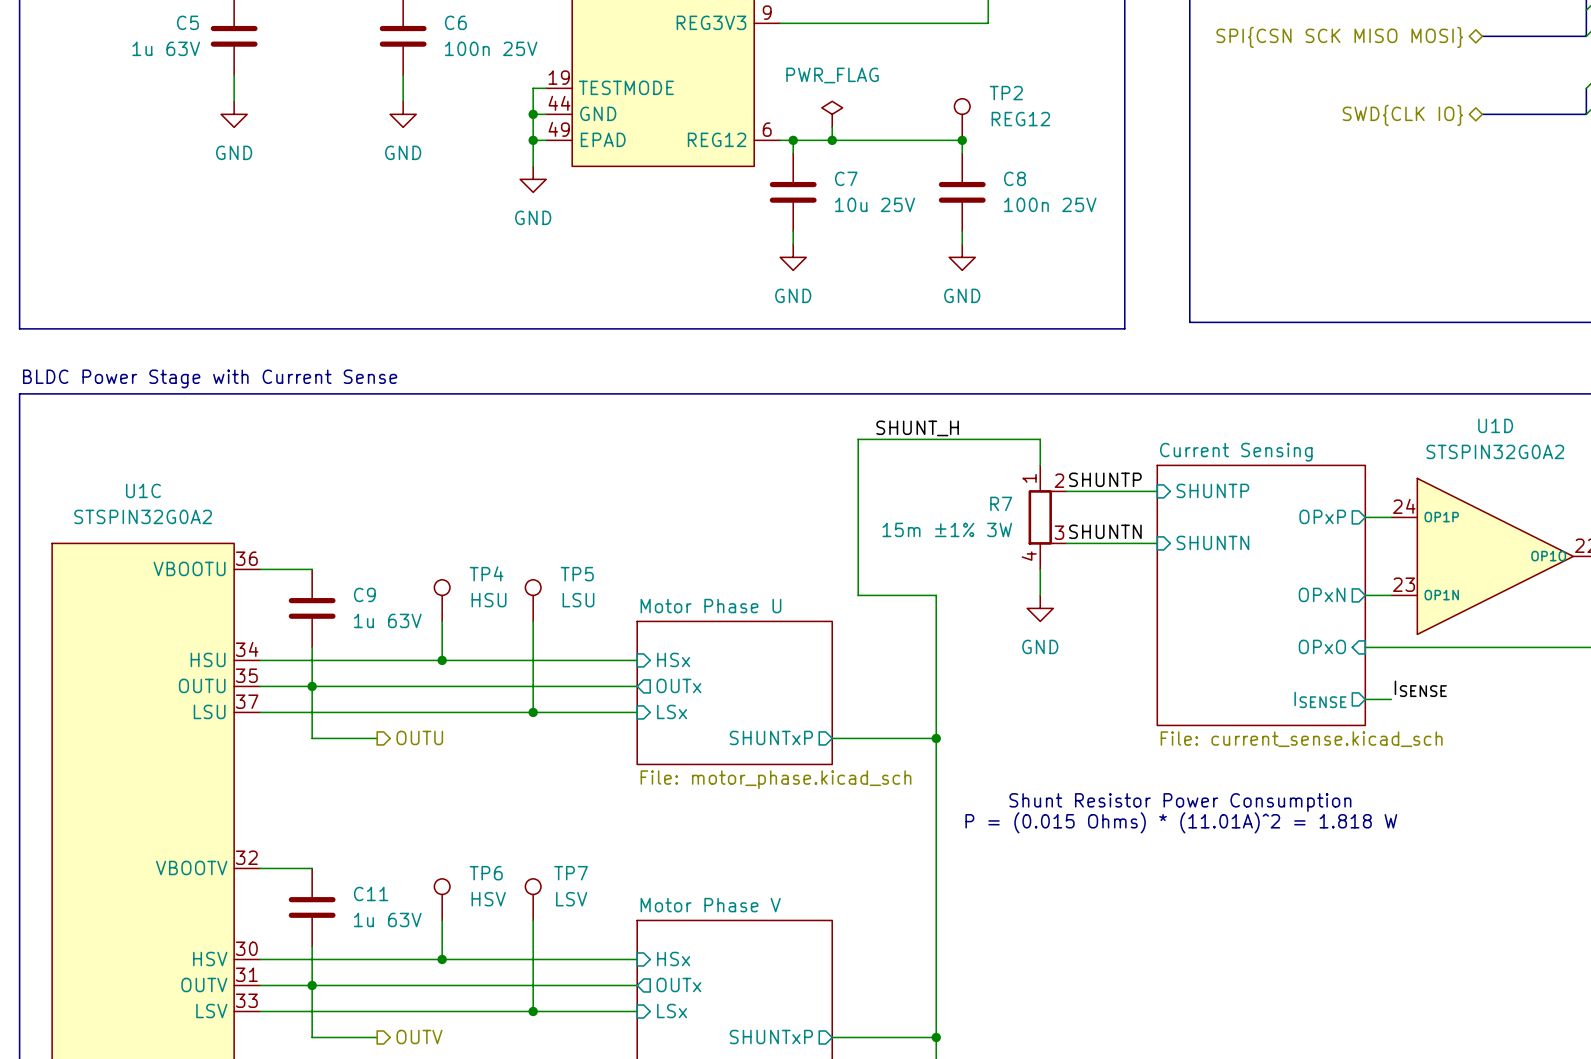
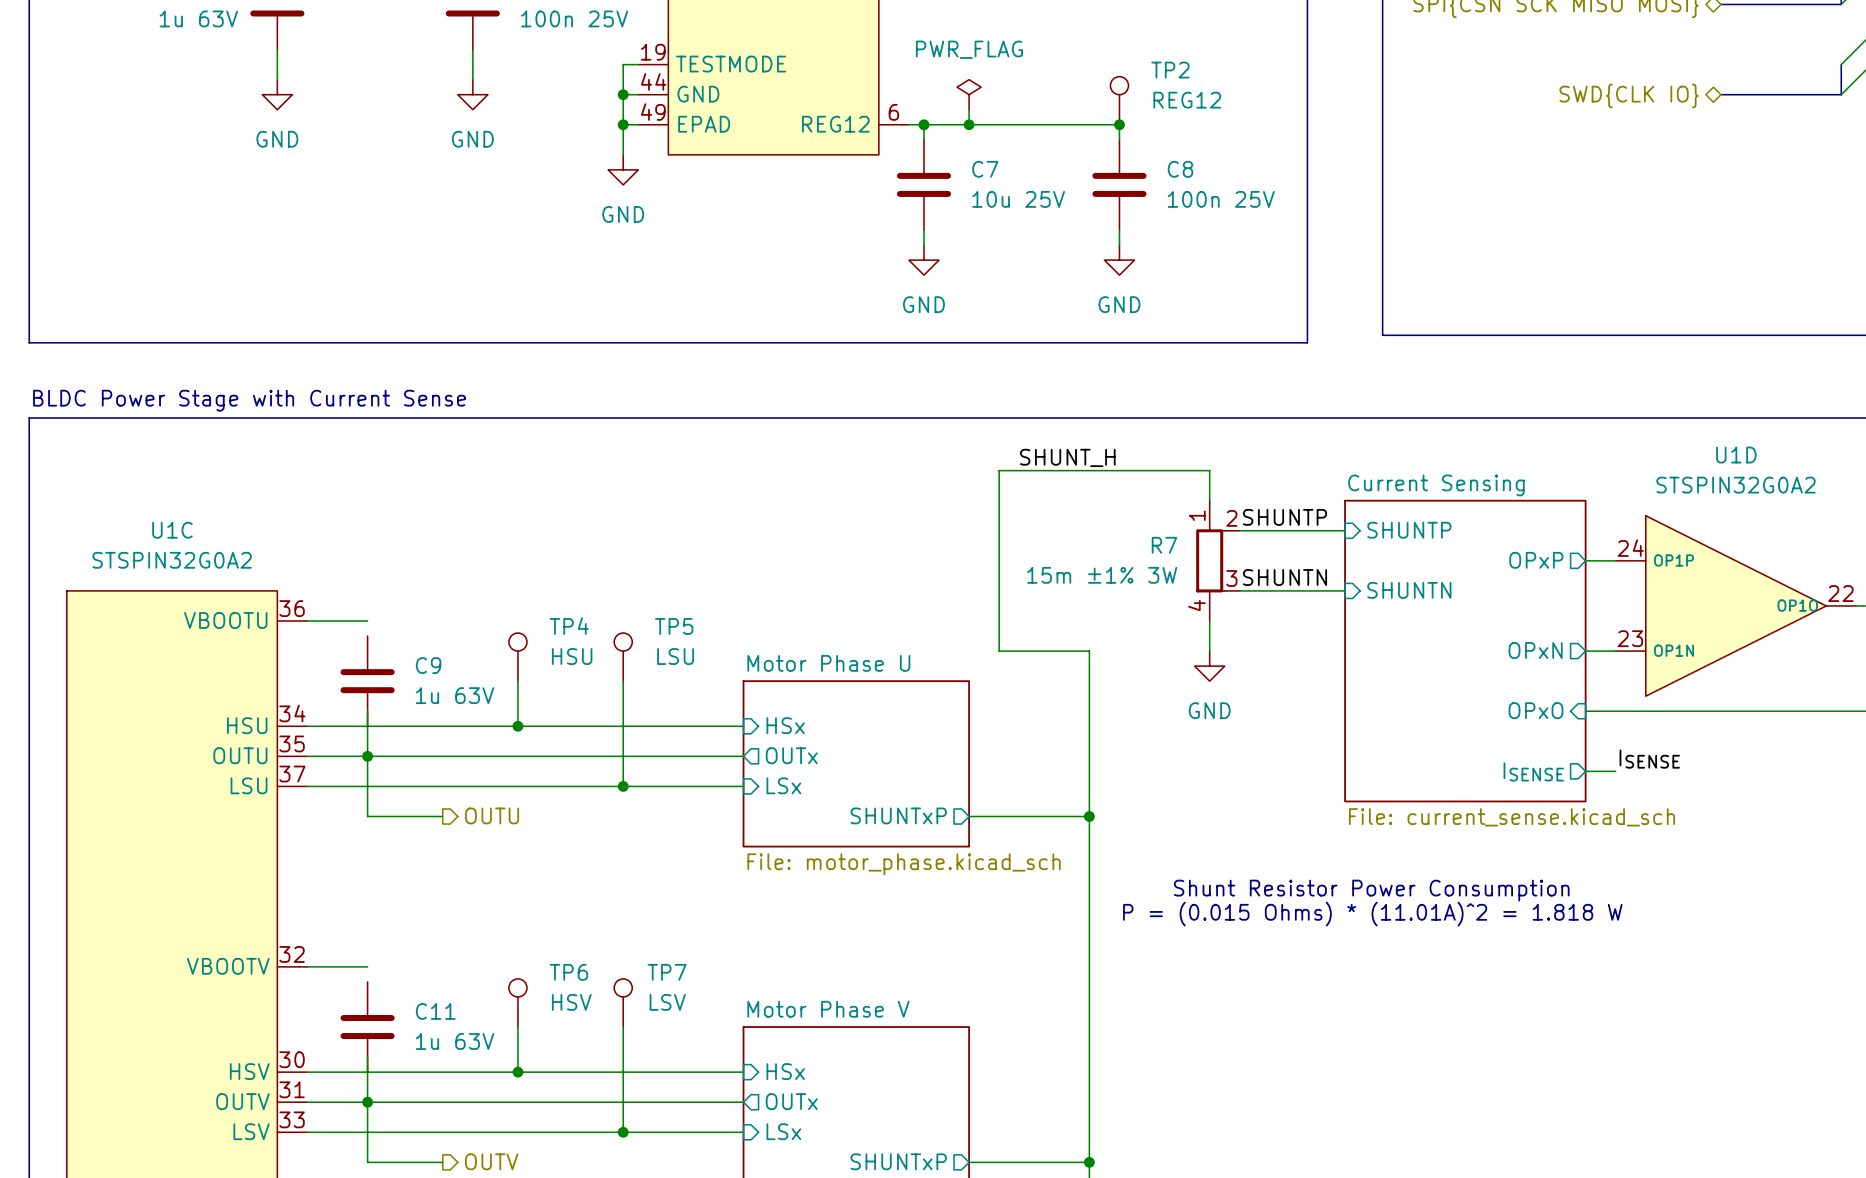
C9 position: (312, 608) -> (367, 681)
C11 position: (312, 907) -> (367, 1027)

